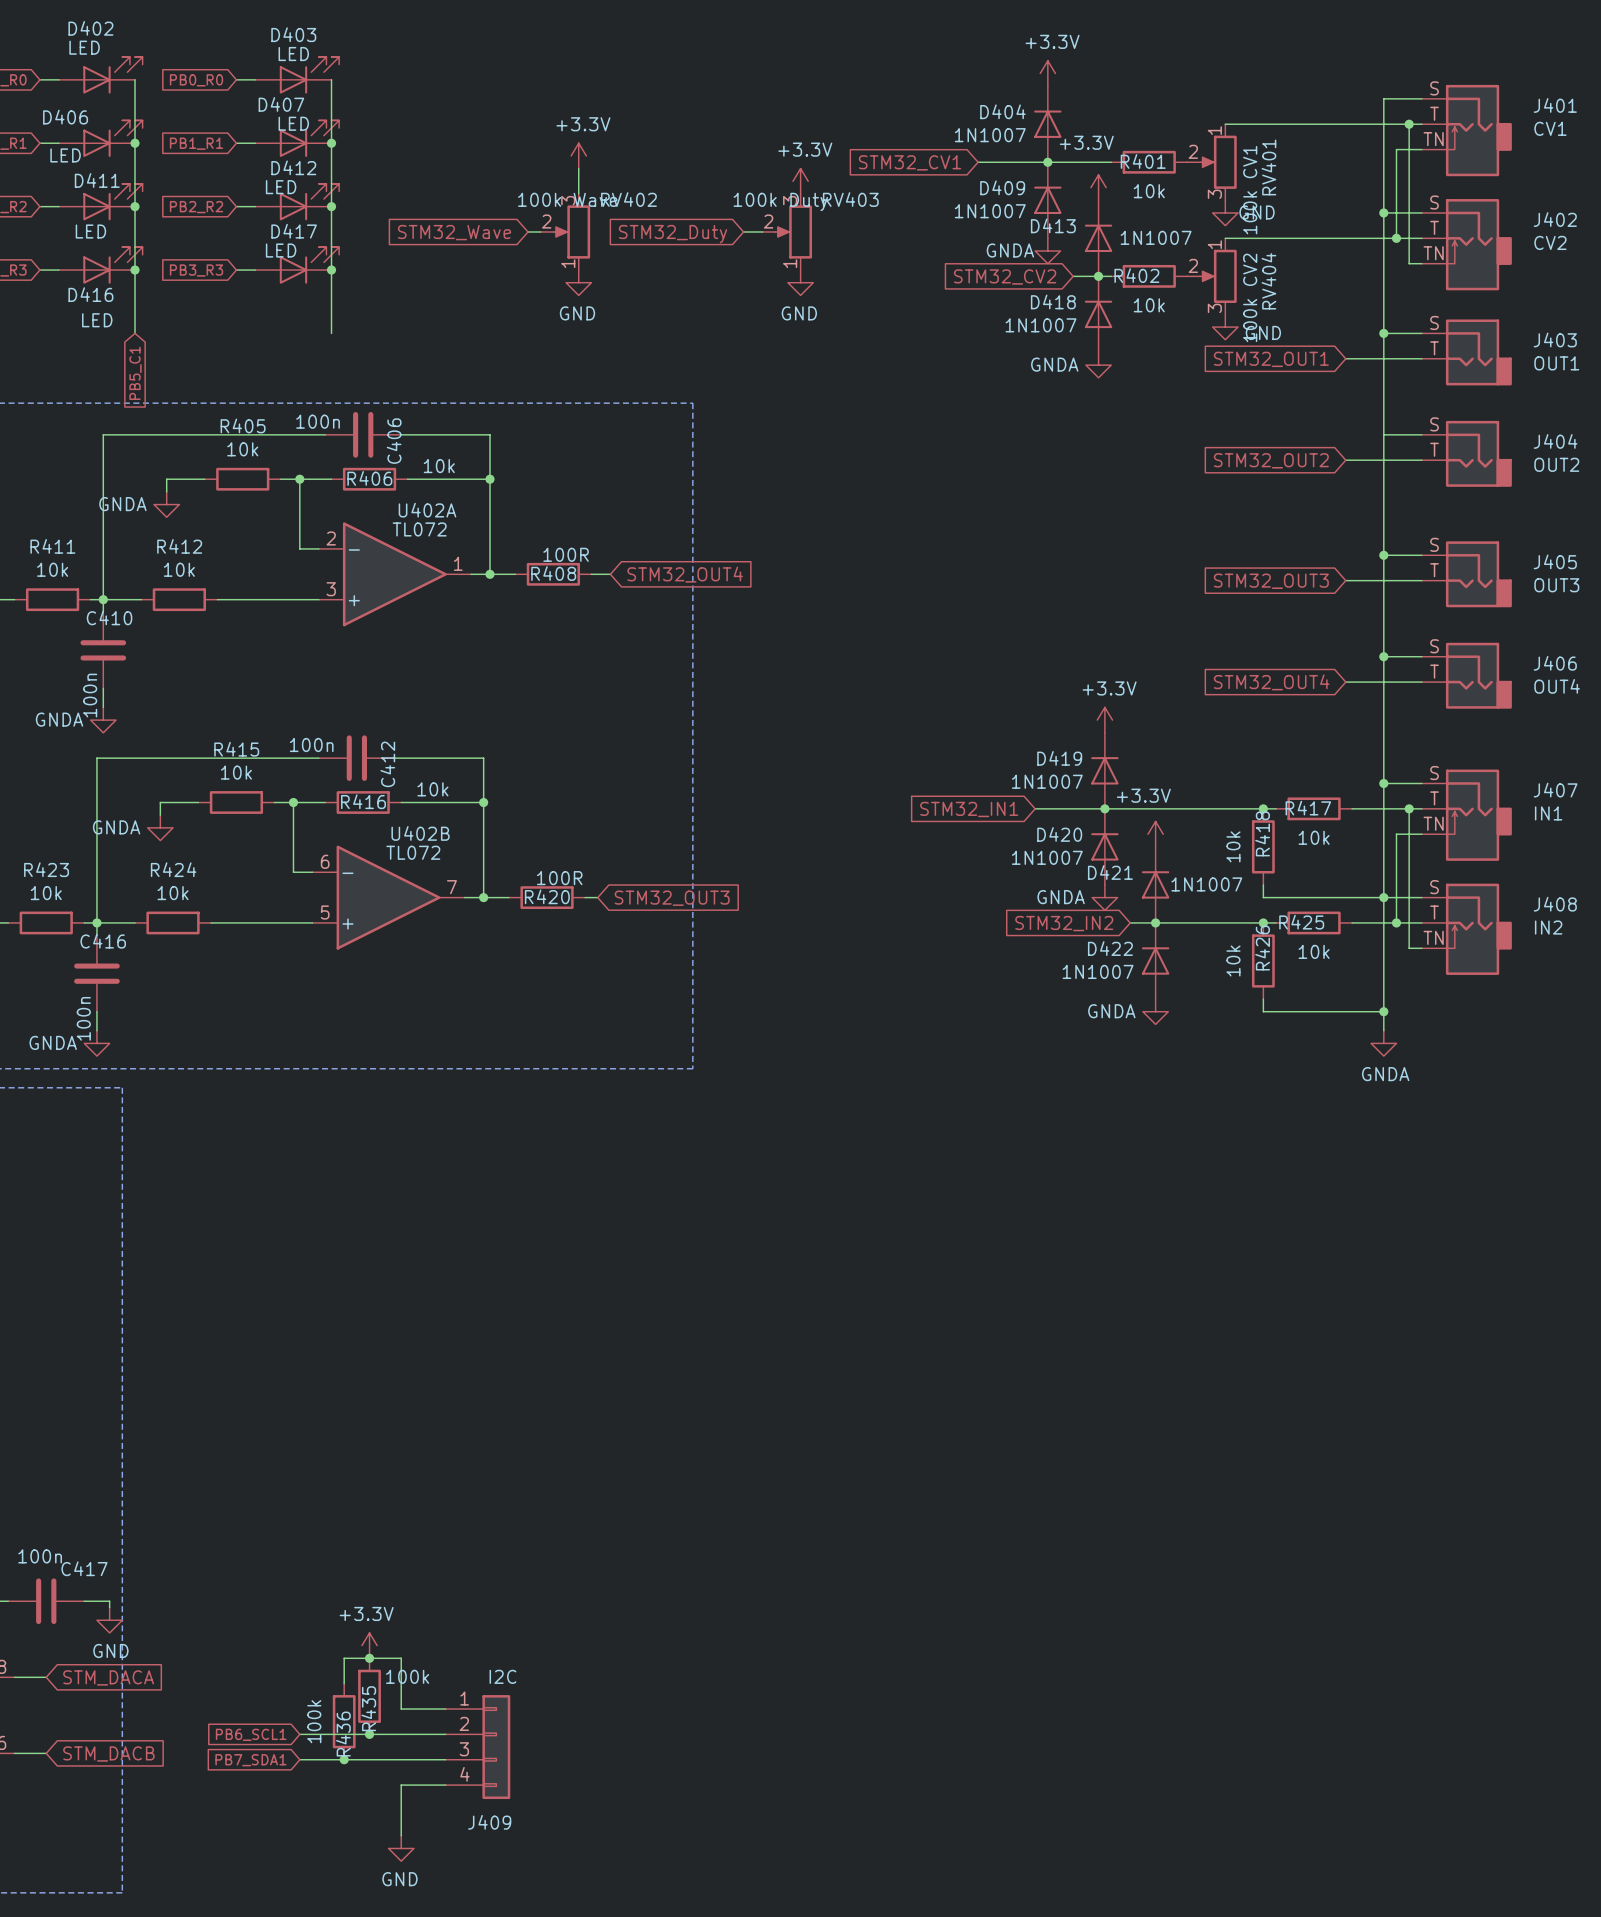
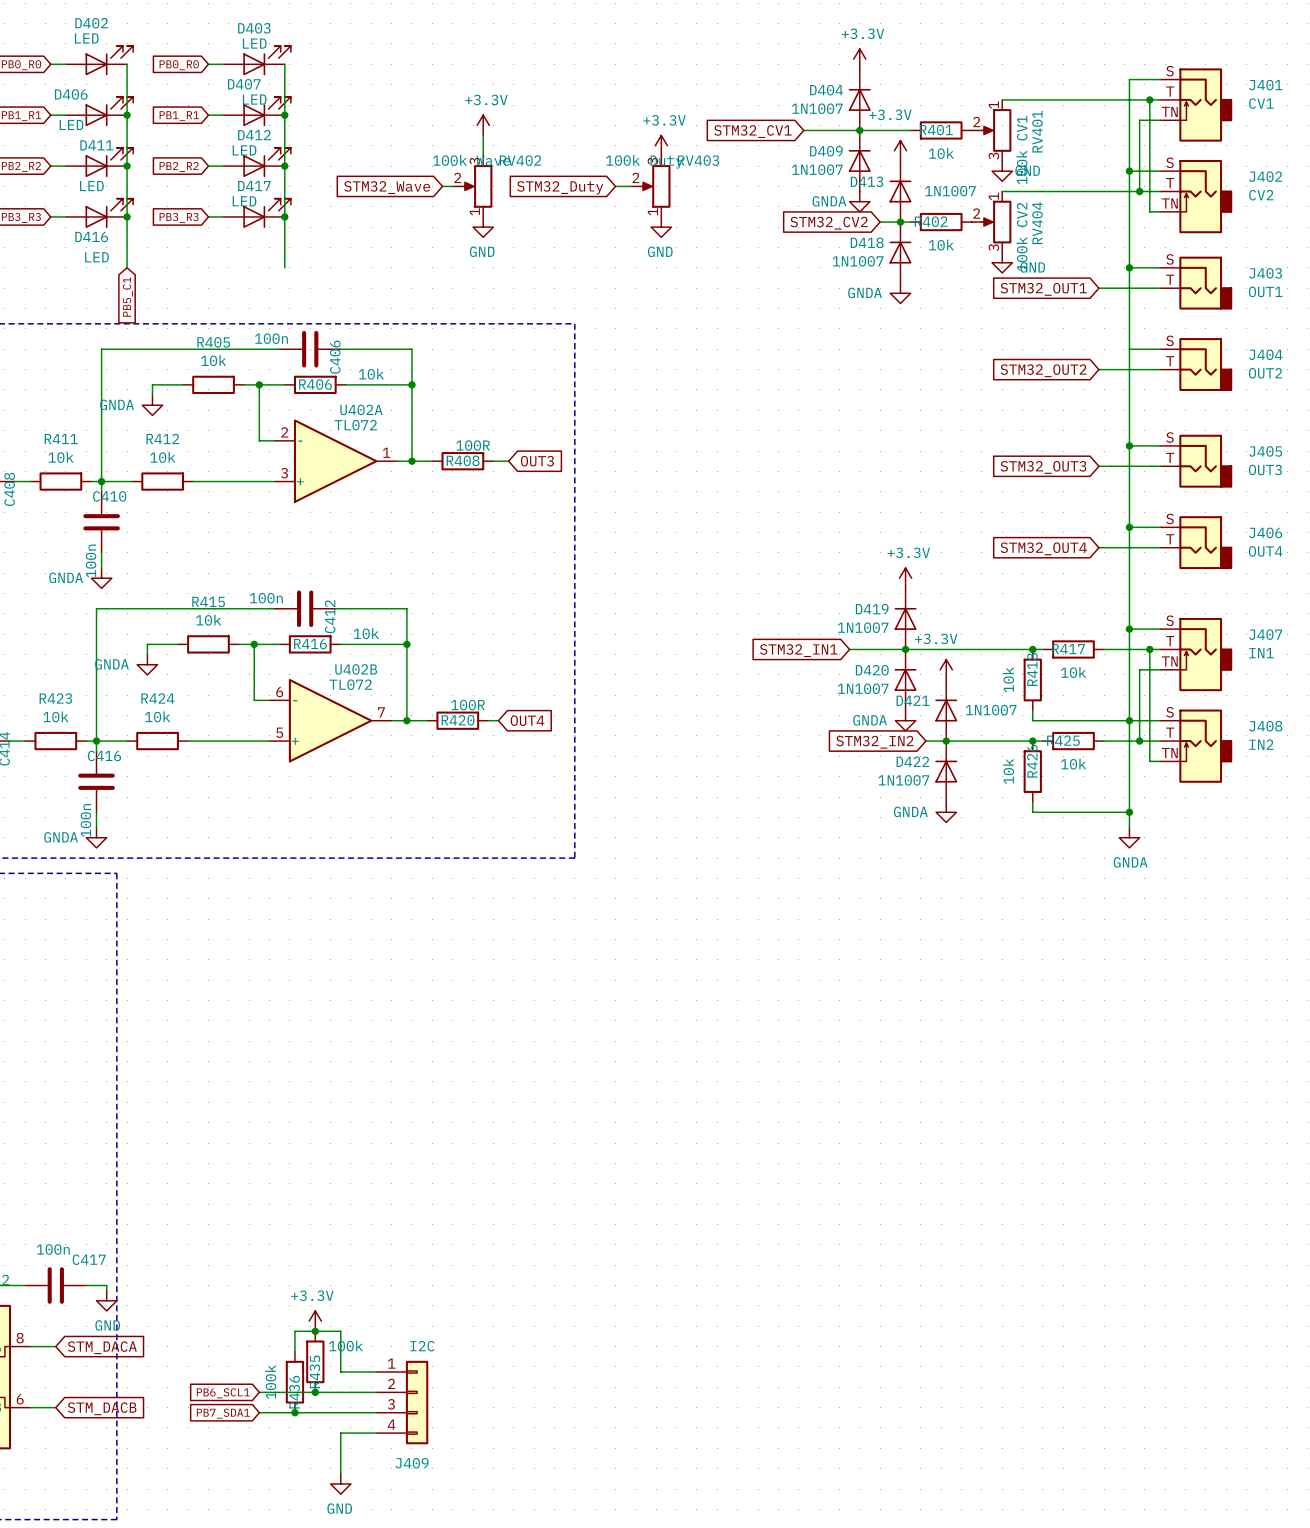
global label: STM32_OUT4 (685, 574) -> OUT3 (537, 461)
global label: STM32_OUT3 (672, 898) -> OUT4 (527, 720)

